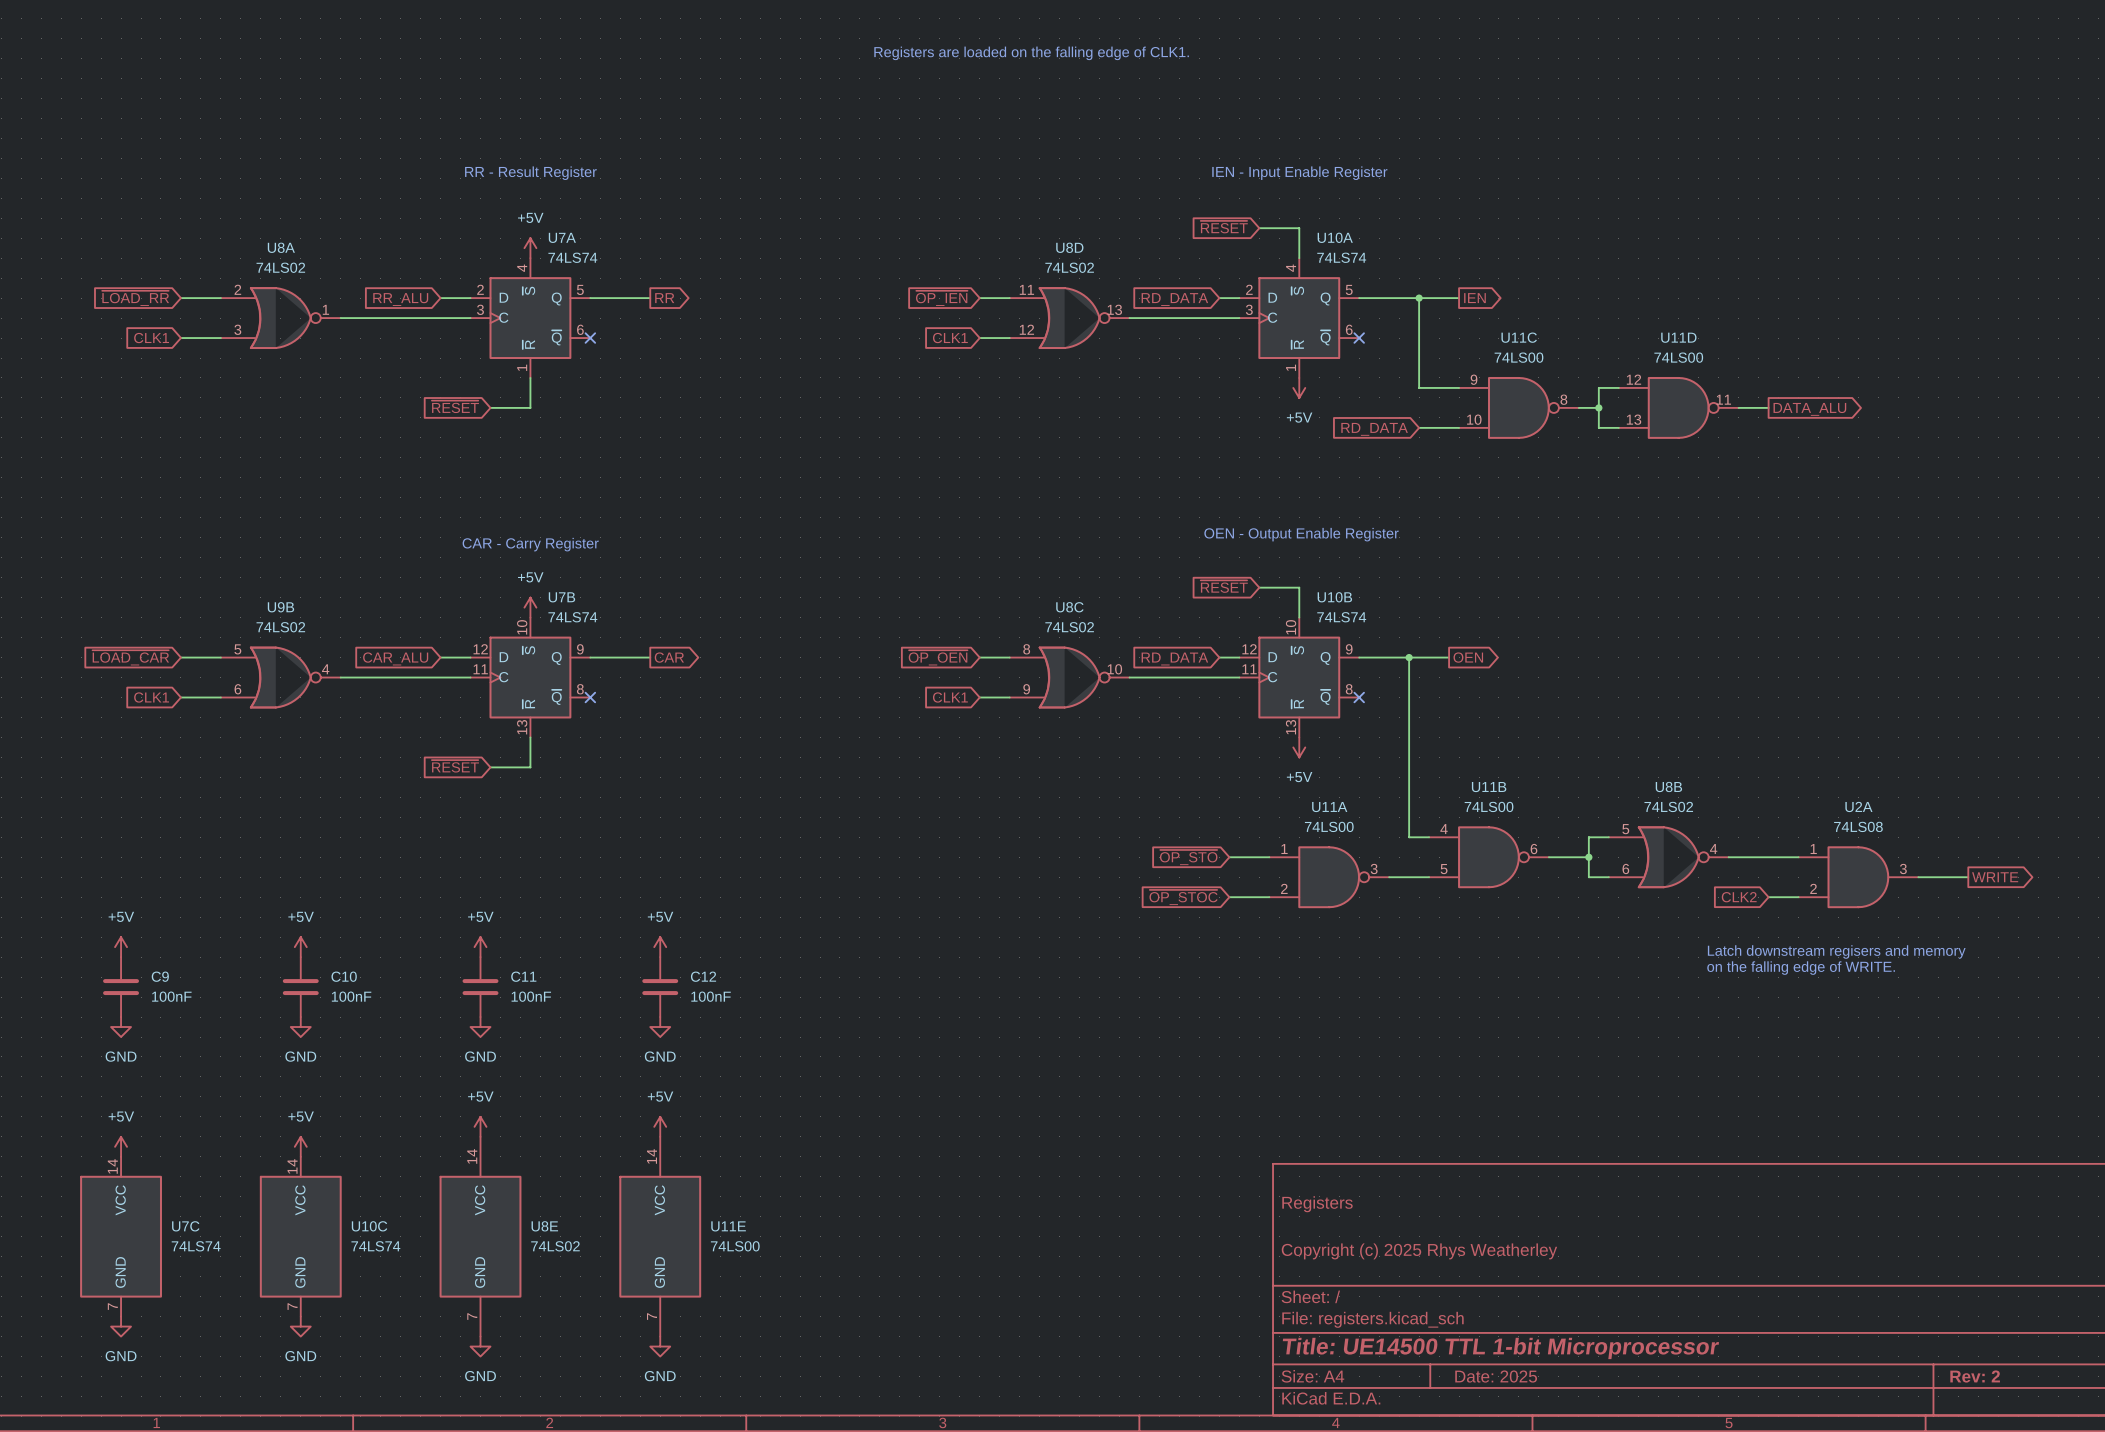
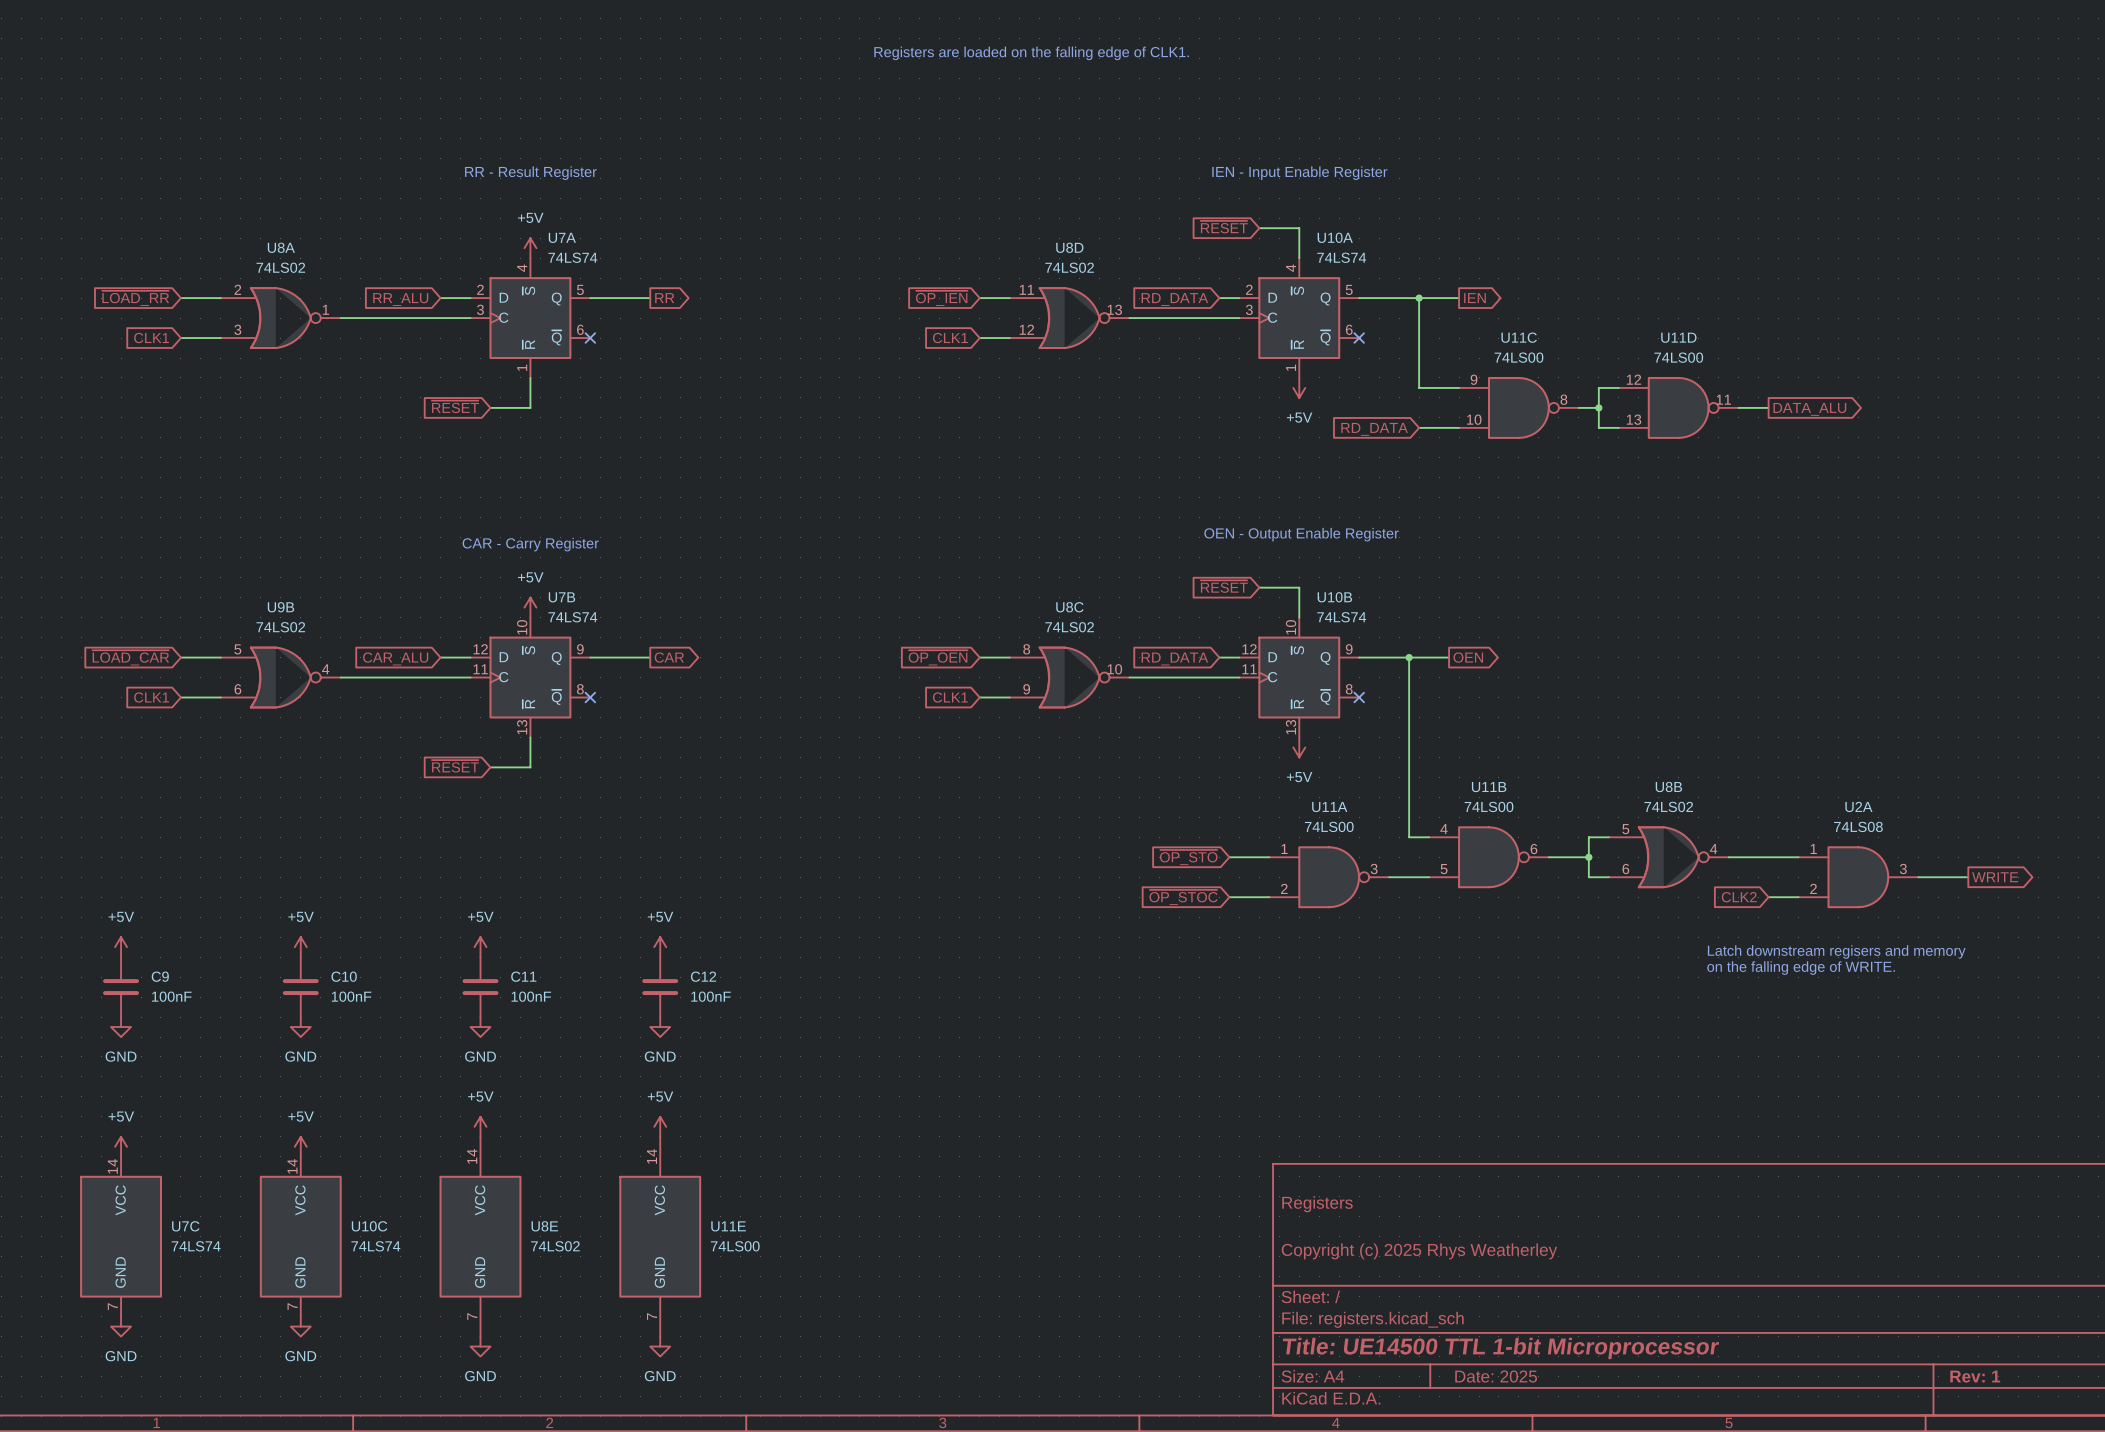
title block: Rev: 2 (1975, 1376) -> Rev: 1 (1975, 1376)

